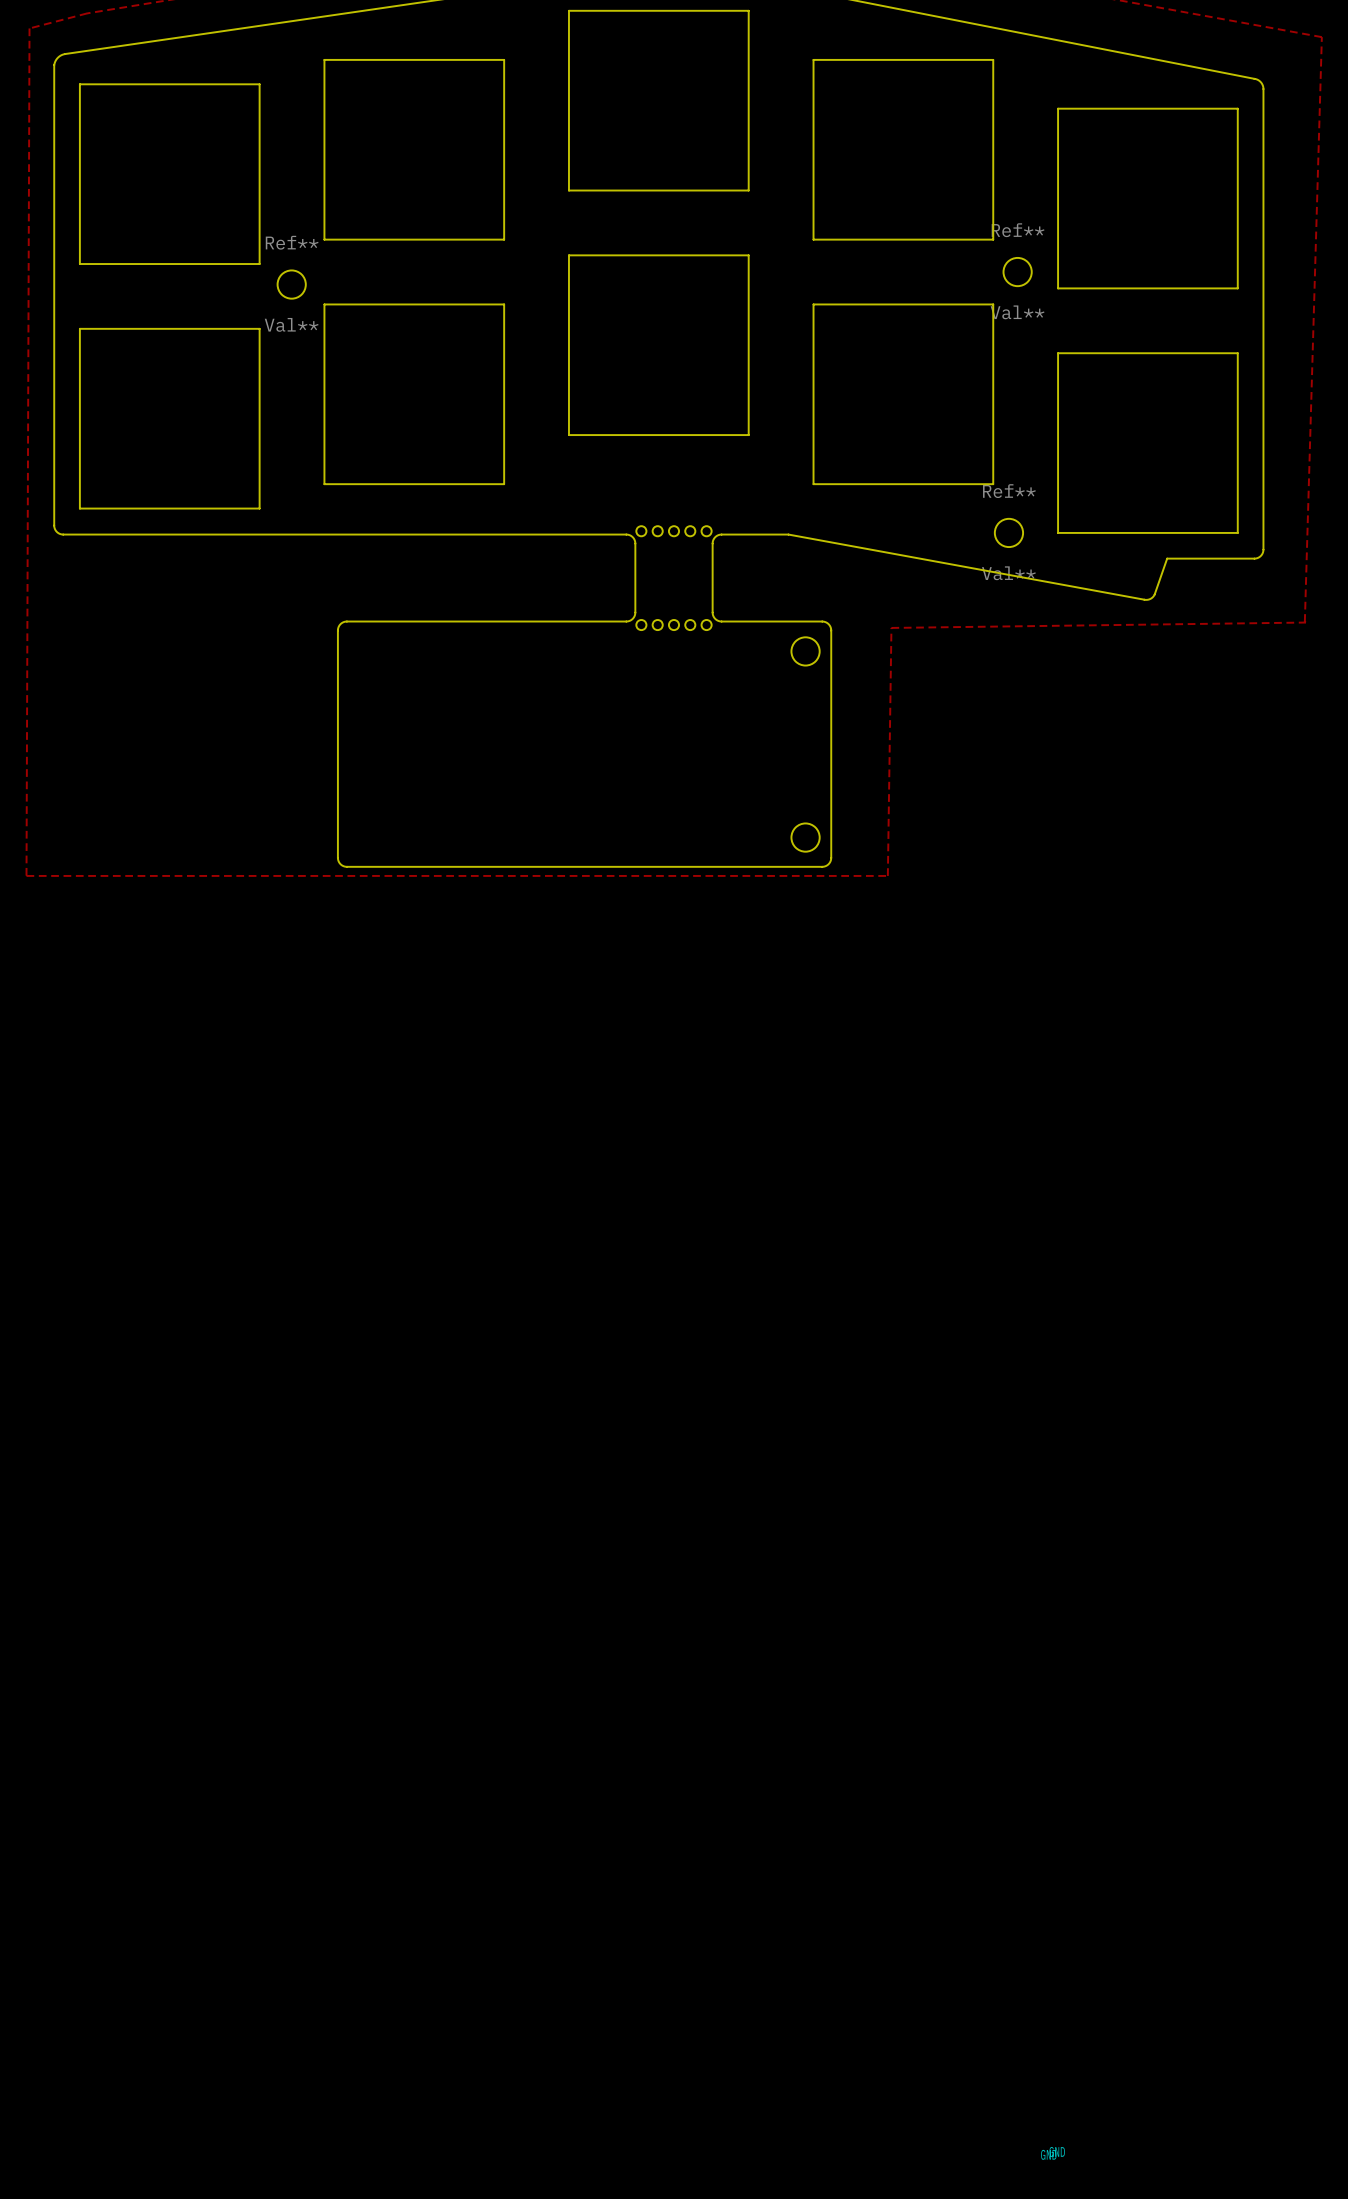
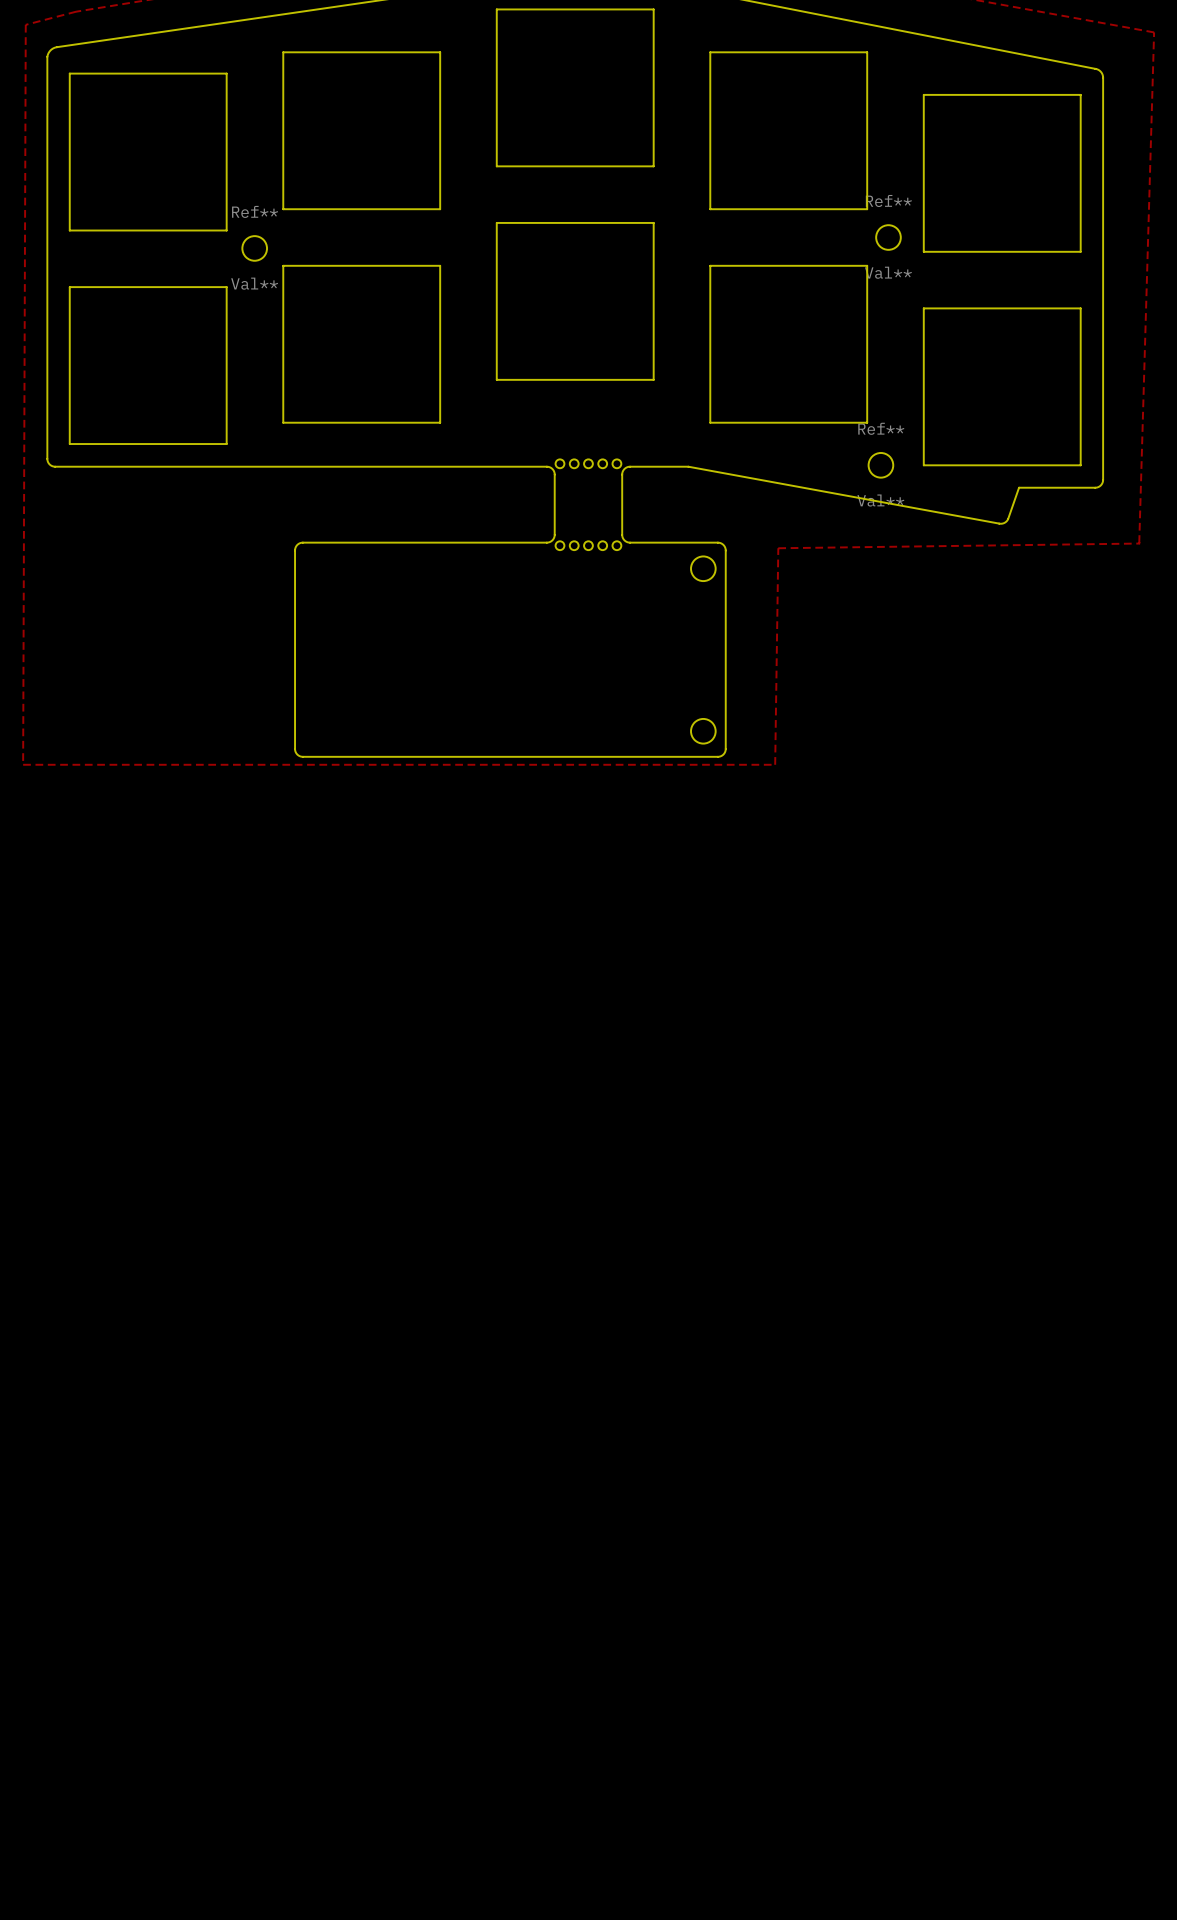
drawing: [1041, 2146, 1065, 2160] -> none

